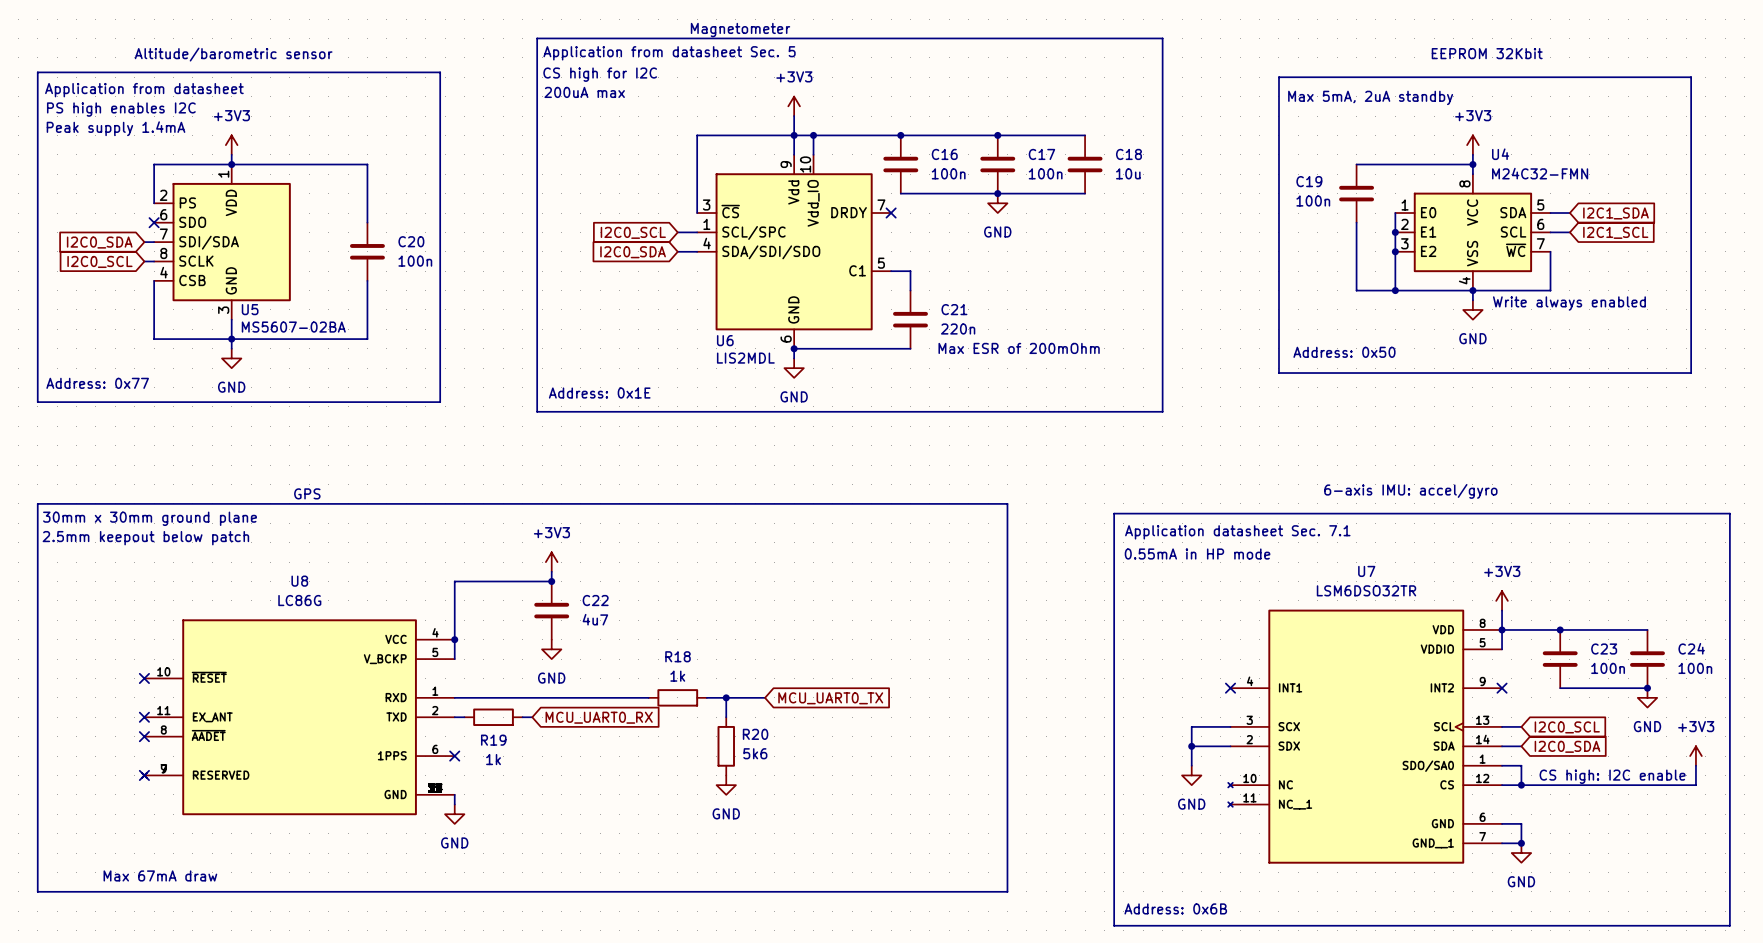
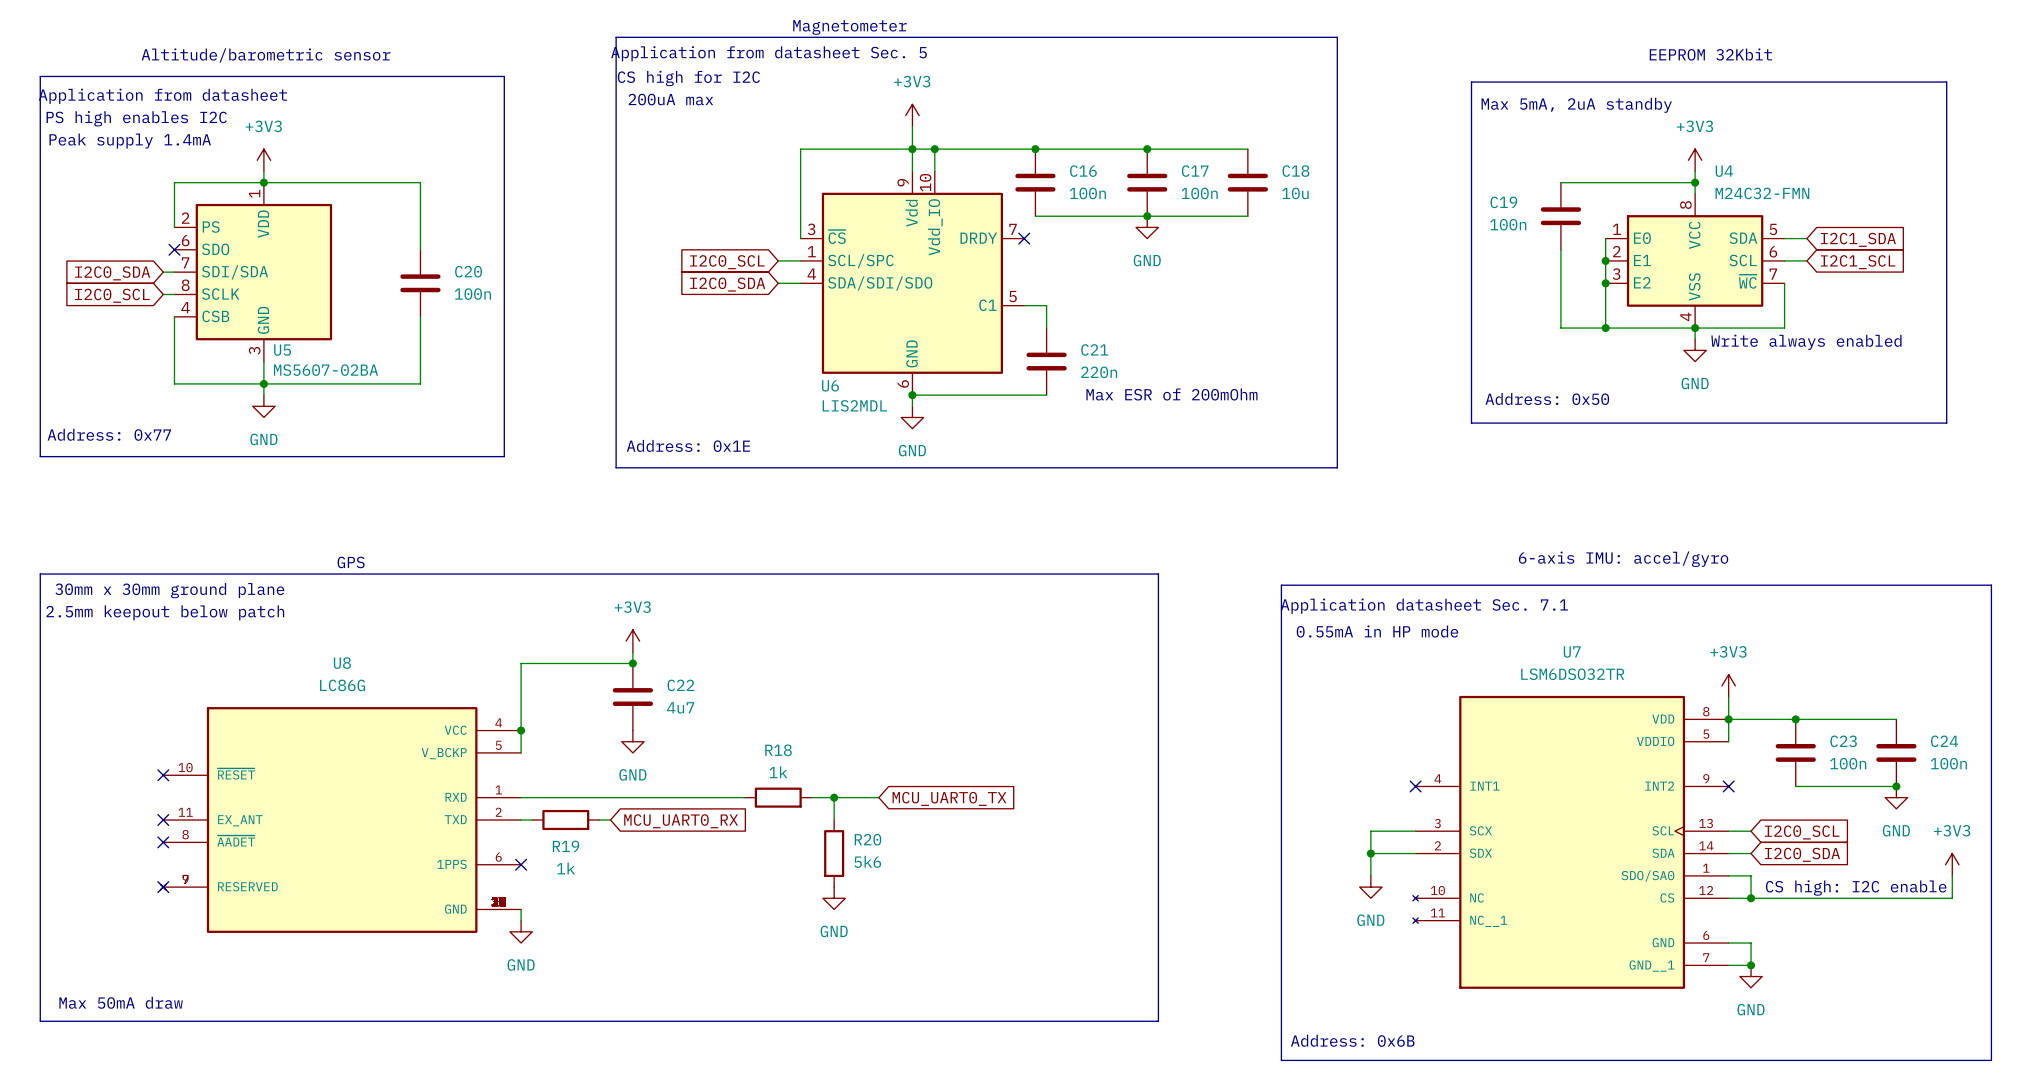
text: Max 67mA draw (160, 875) -> Max 50mA draw (121, 1002)

